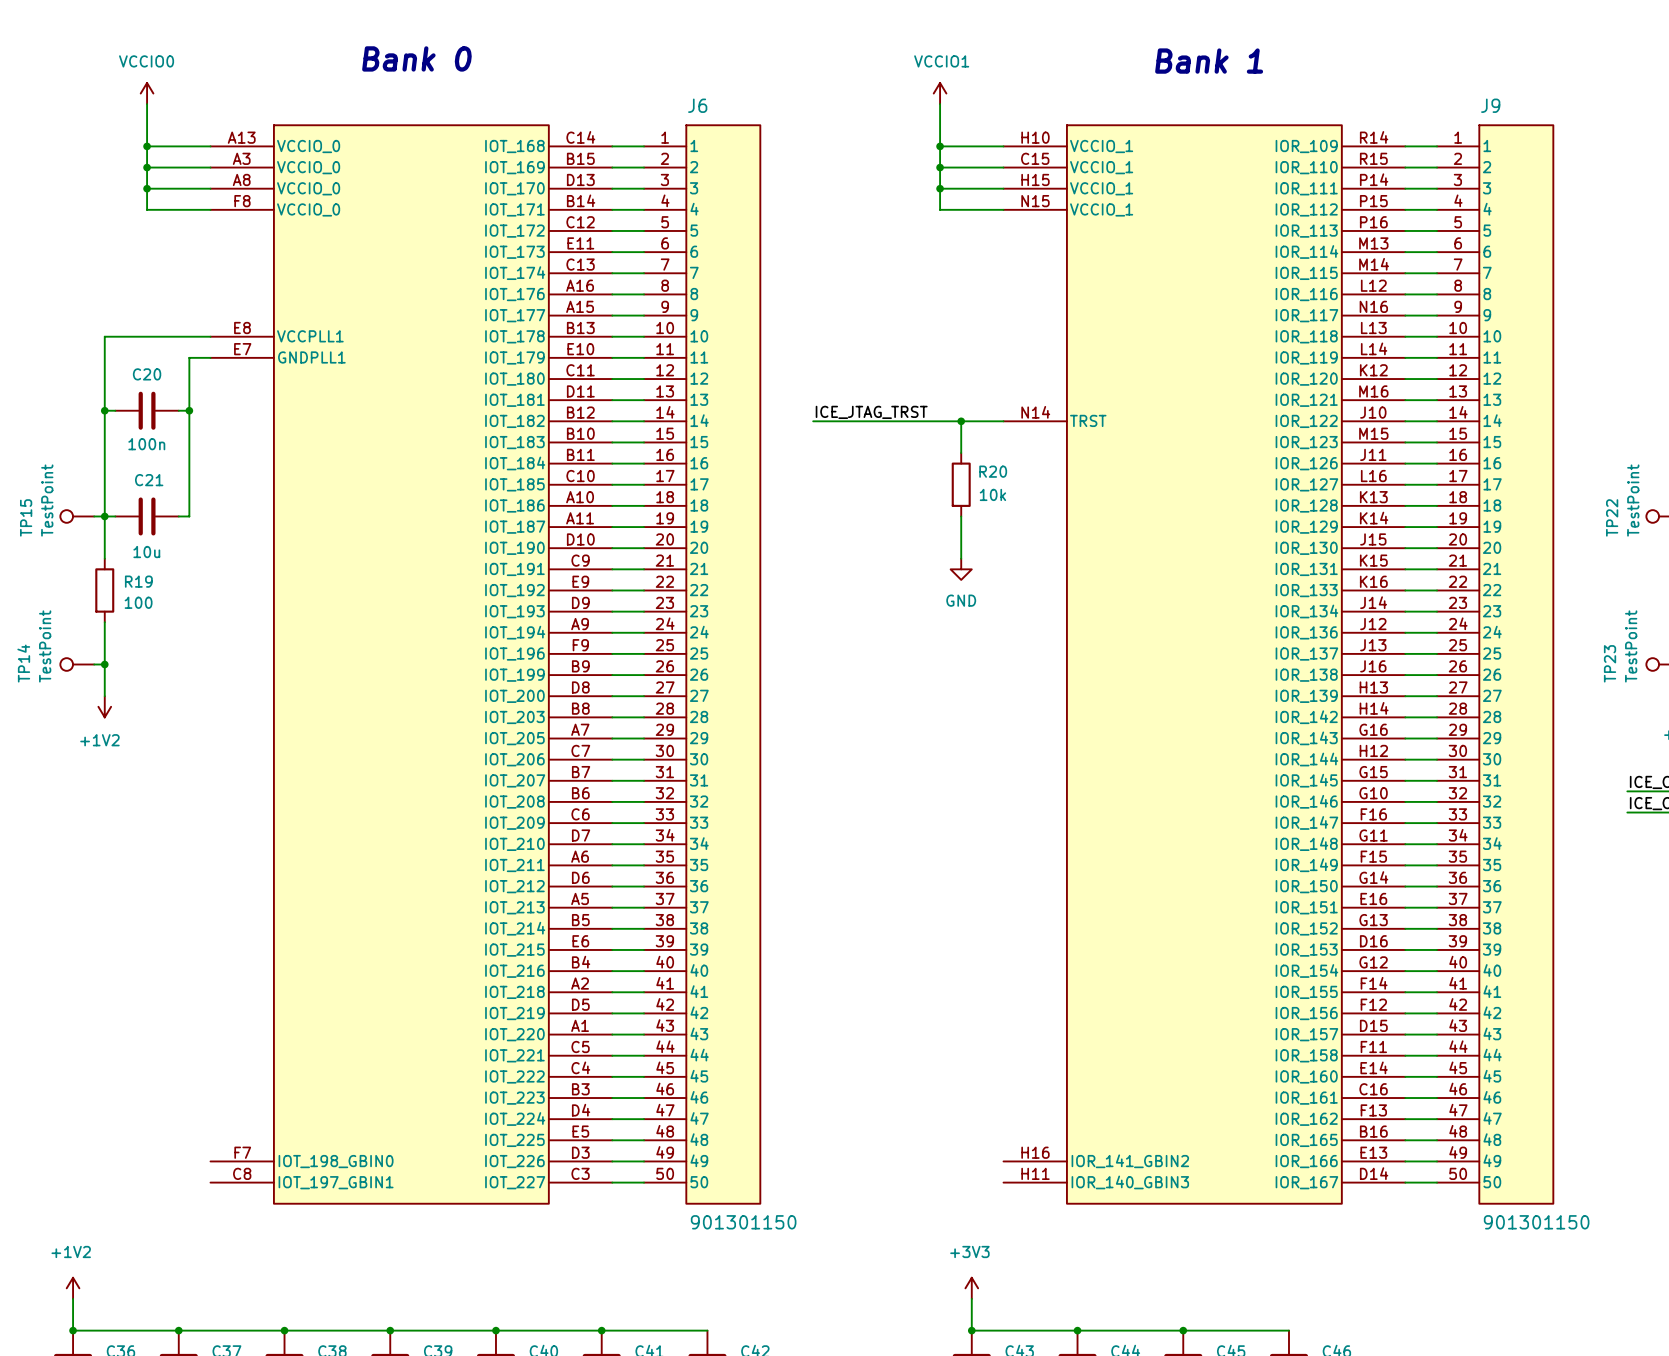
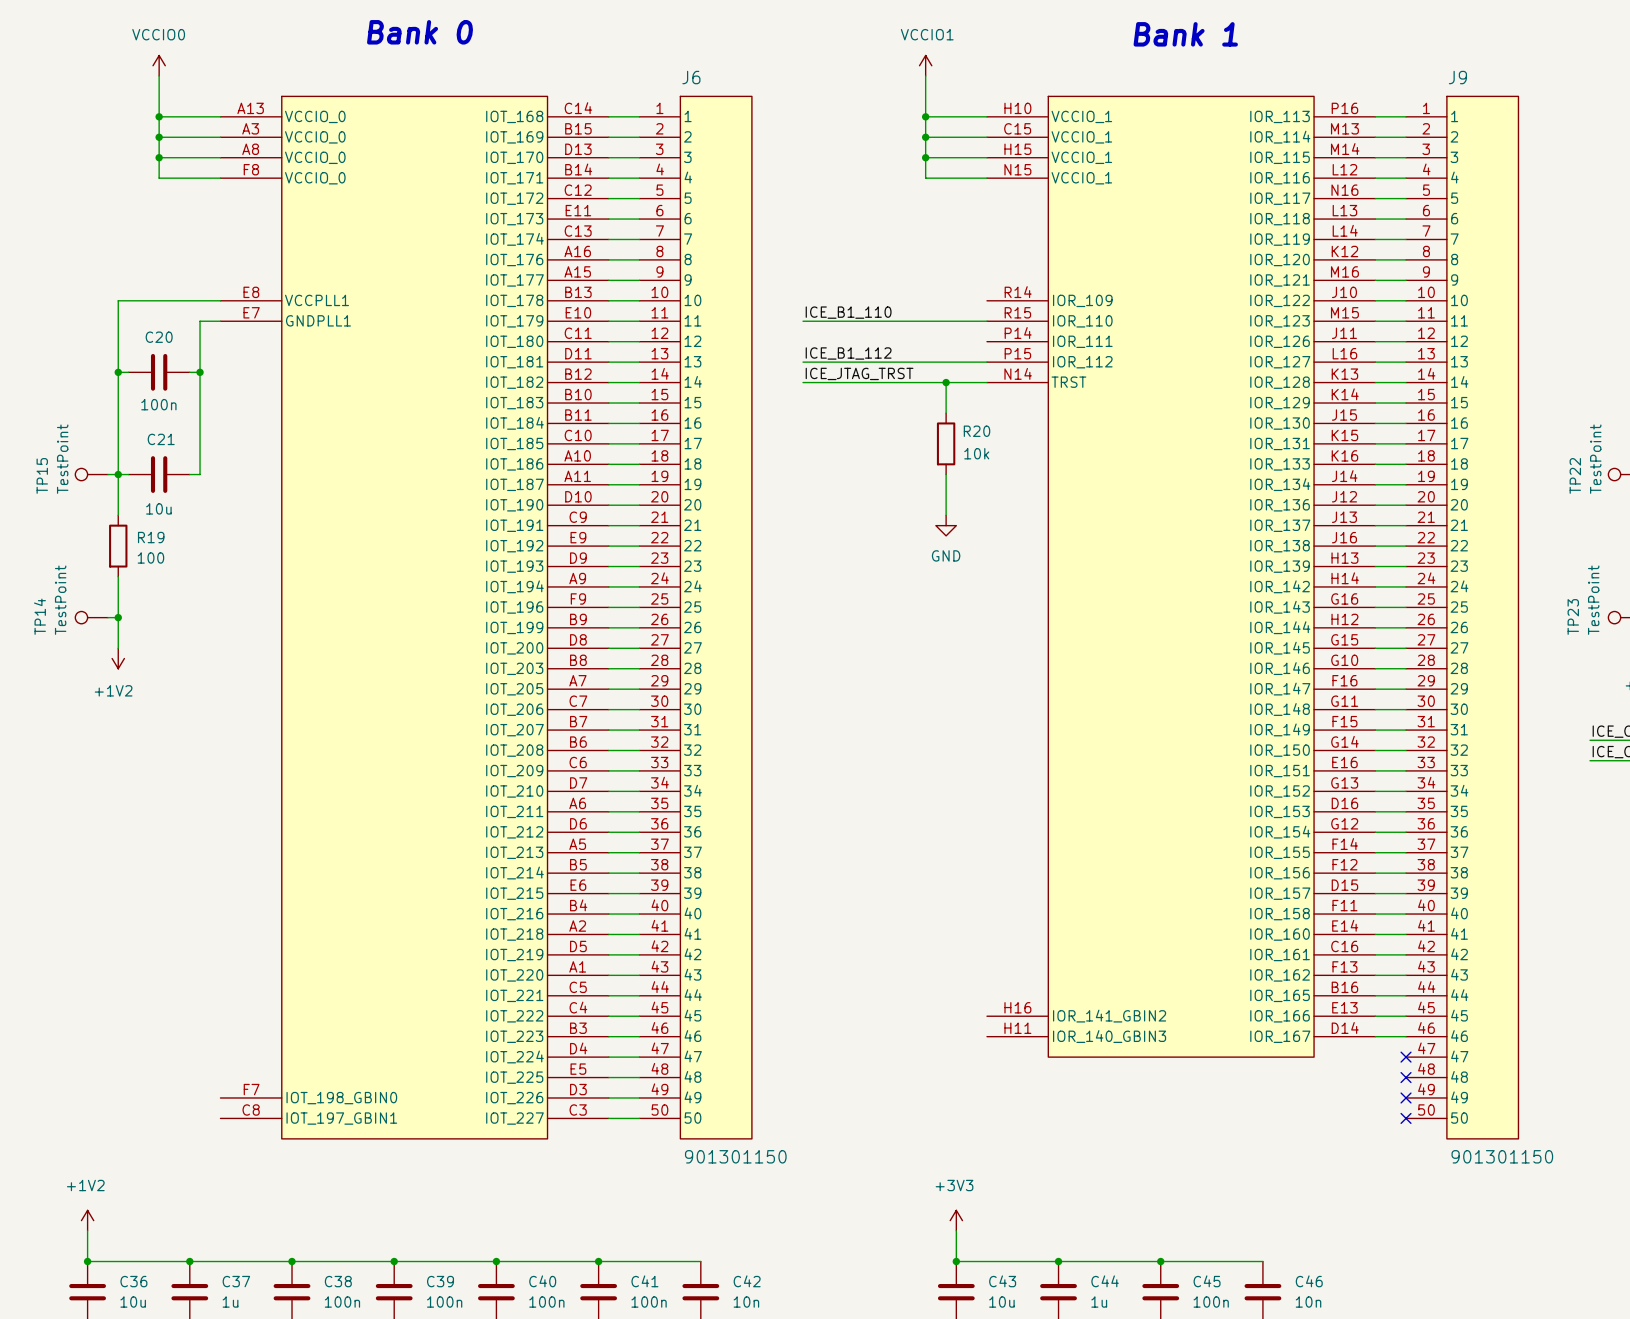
label: none -> ICE_B1_110 (848, 312)
wire: none -> (803, 321) (986, 321)
label: none -> ICE_B1_112 (848, 353)
wire: none -> (803, 362) (986, 362)
part: none -> (1181, 576)
part: (1204, 664) -> none
wire: (1405, 1119) (1437, 1119) -> none
no-connect mark: none -> (1406, 1057)
wire: (1405, 1140) (1437, 1140) -> none
no-connect mark: none -> (1406, 1077)
wire: (1405, 1161) (1437, 1161) -> none
no-connect mark: none -> (1406, 1097)
wire: (1405, 1182) (1437, 1182) -> none
no-connect mark: none -> (1406, 1118)

